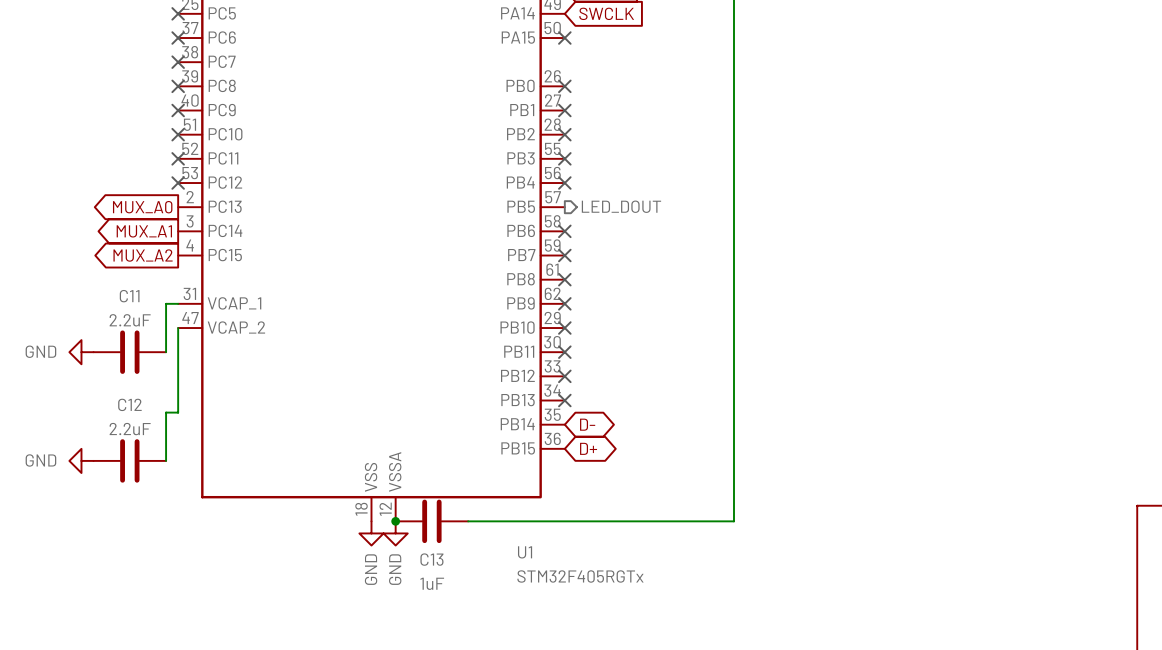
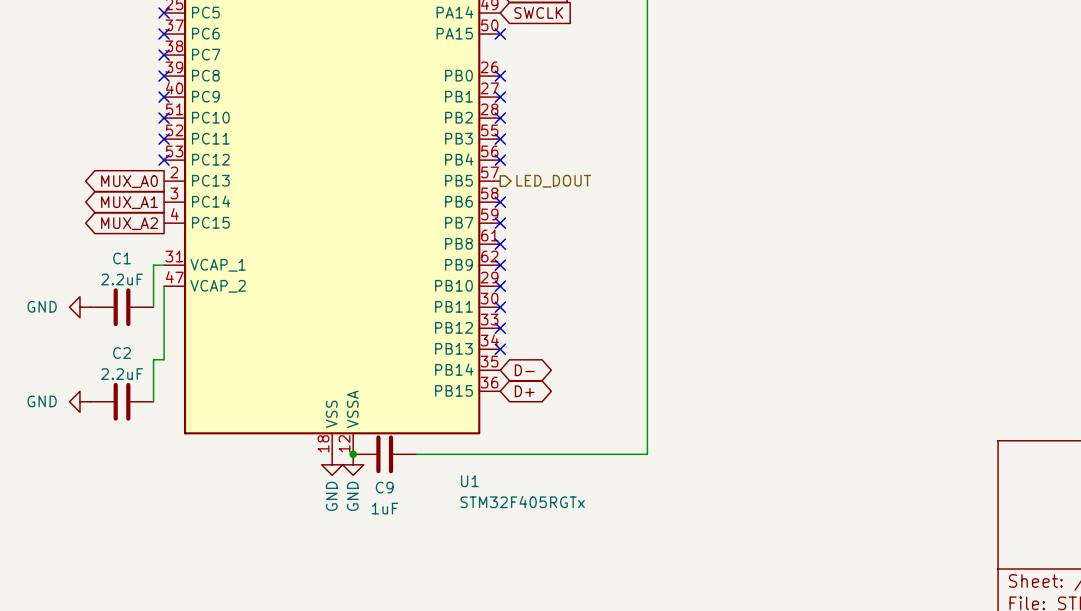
C11 name: C11 (129, 296) -> C1 (122, 258)
C12 name: C12 (129, 404) -> C2 (122, 353)
C13 name: C13 (431, 559) -> C9 (384, 487)

